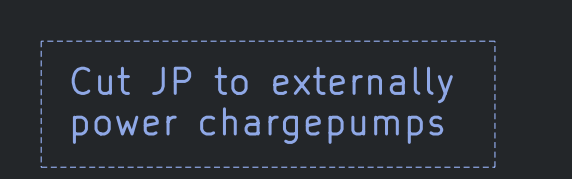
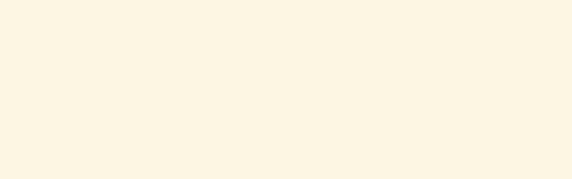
line: (41, 41) (41, 167) (494, 167) (494, 41) (41, 41) -> none
text: Cut JP to externally (262, 85) -> none
text: power chargepumps (258, 125) -> none

